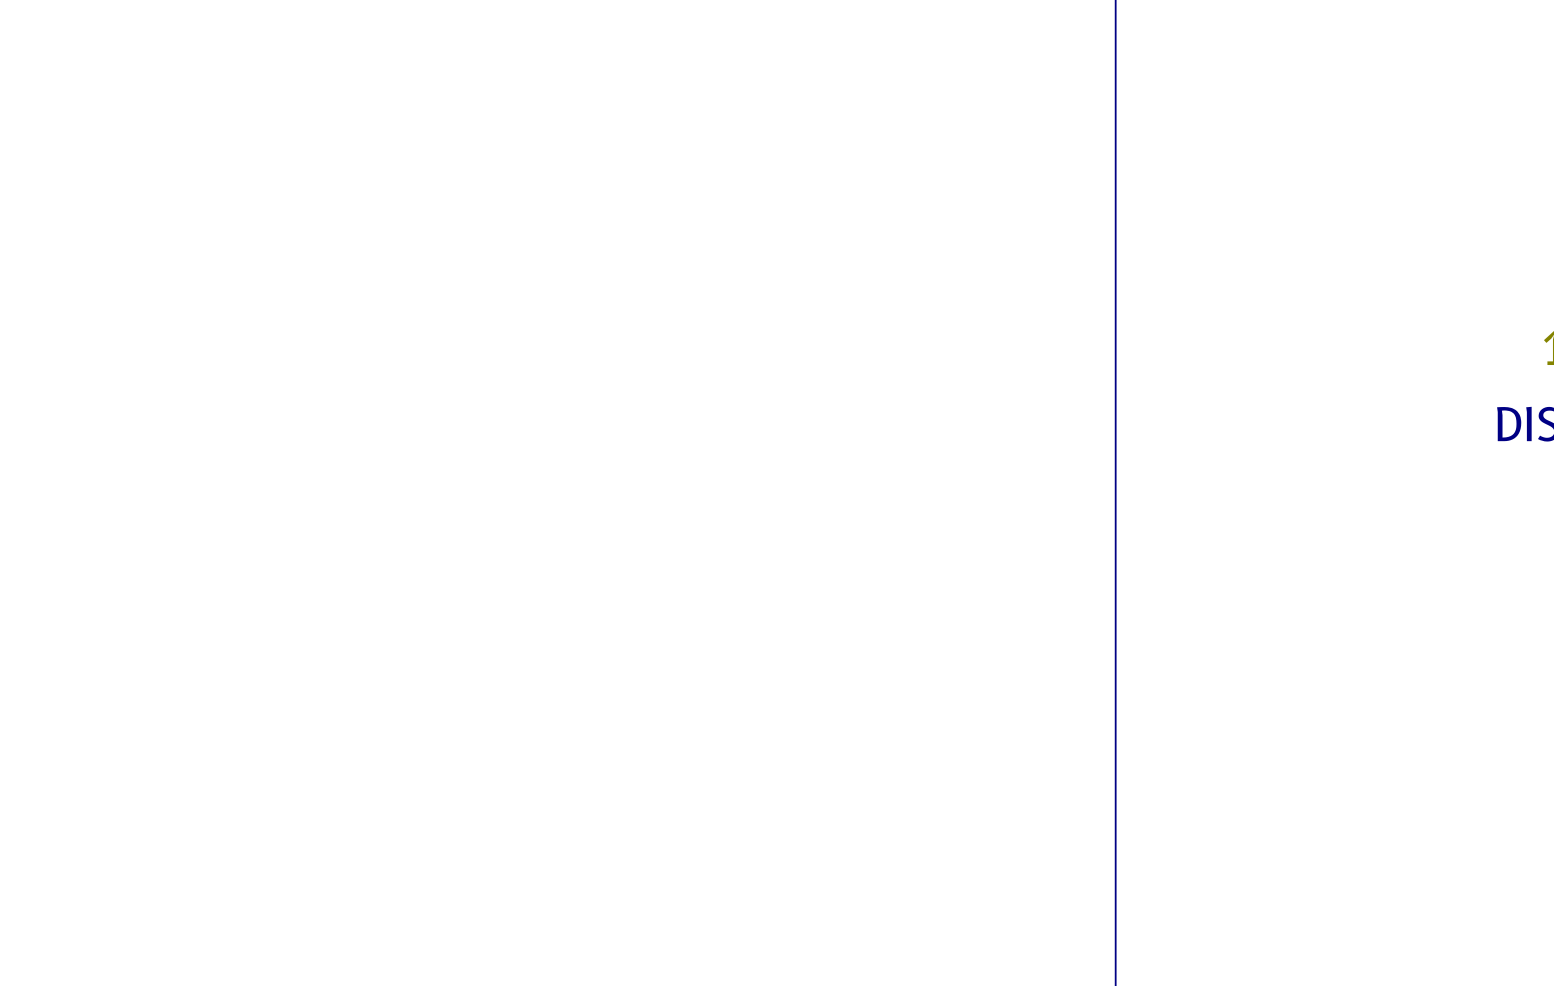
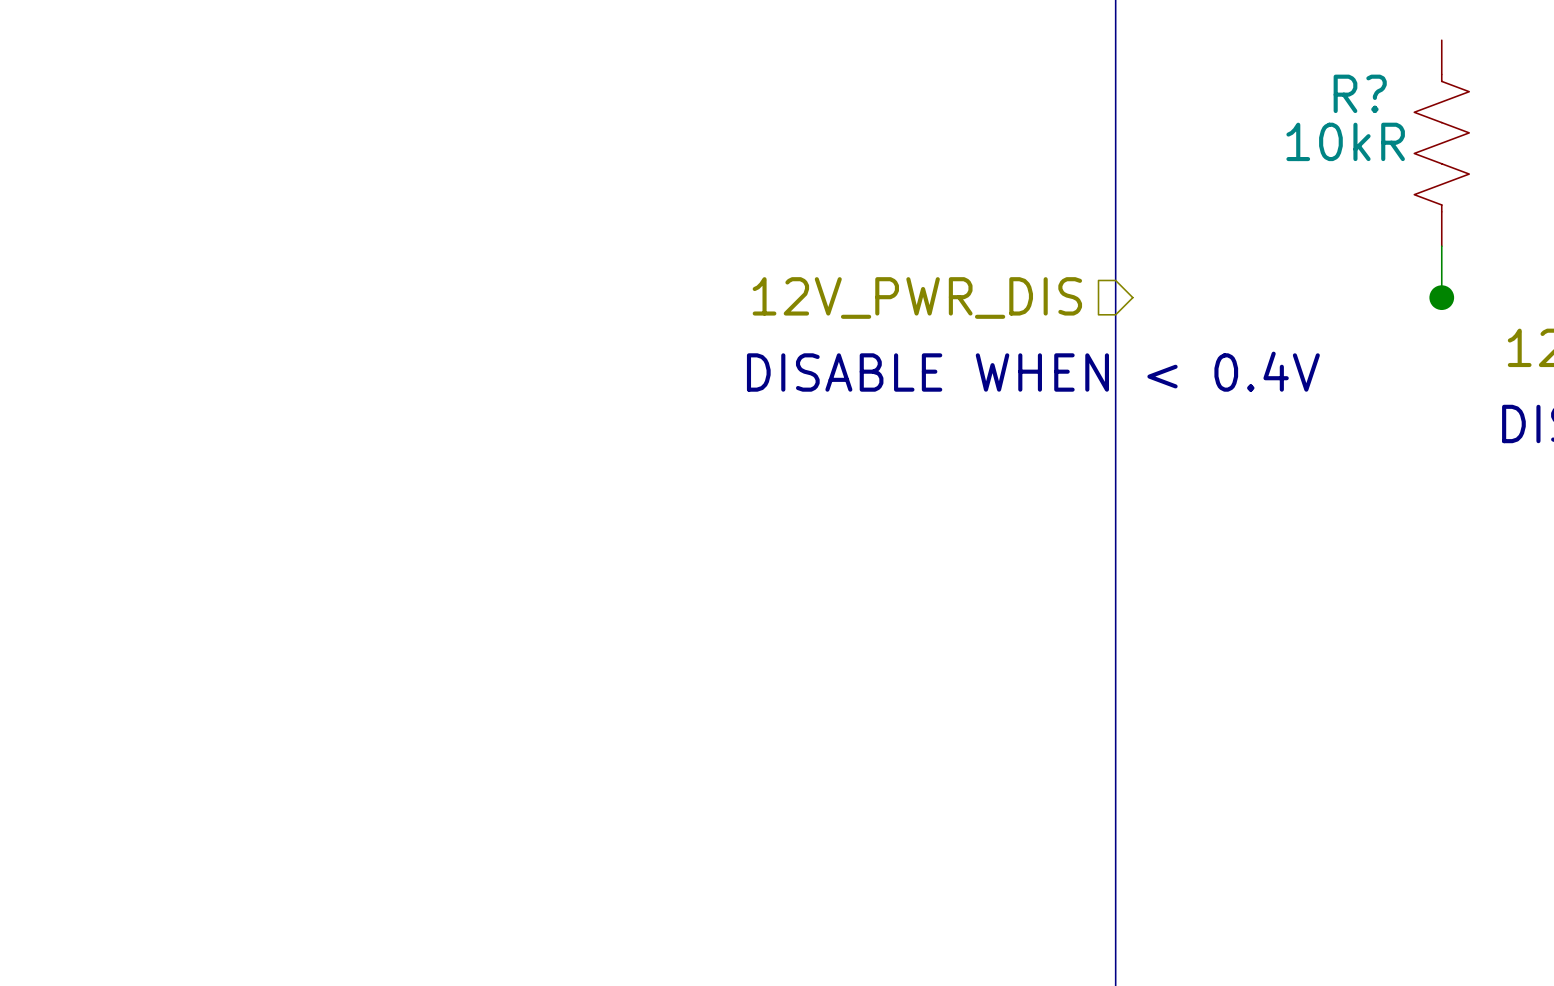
R?: none -> 10kR (1441, 143)
wire: none -> (1441, 246) (1441, 297)
junction: none -> (1441, 297)
hierarchical label: none -> 12V_PWR_DIS (917, 297)
text: none -> DISABLE WHEN < 0.4V (1033, 371)

